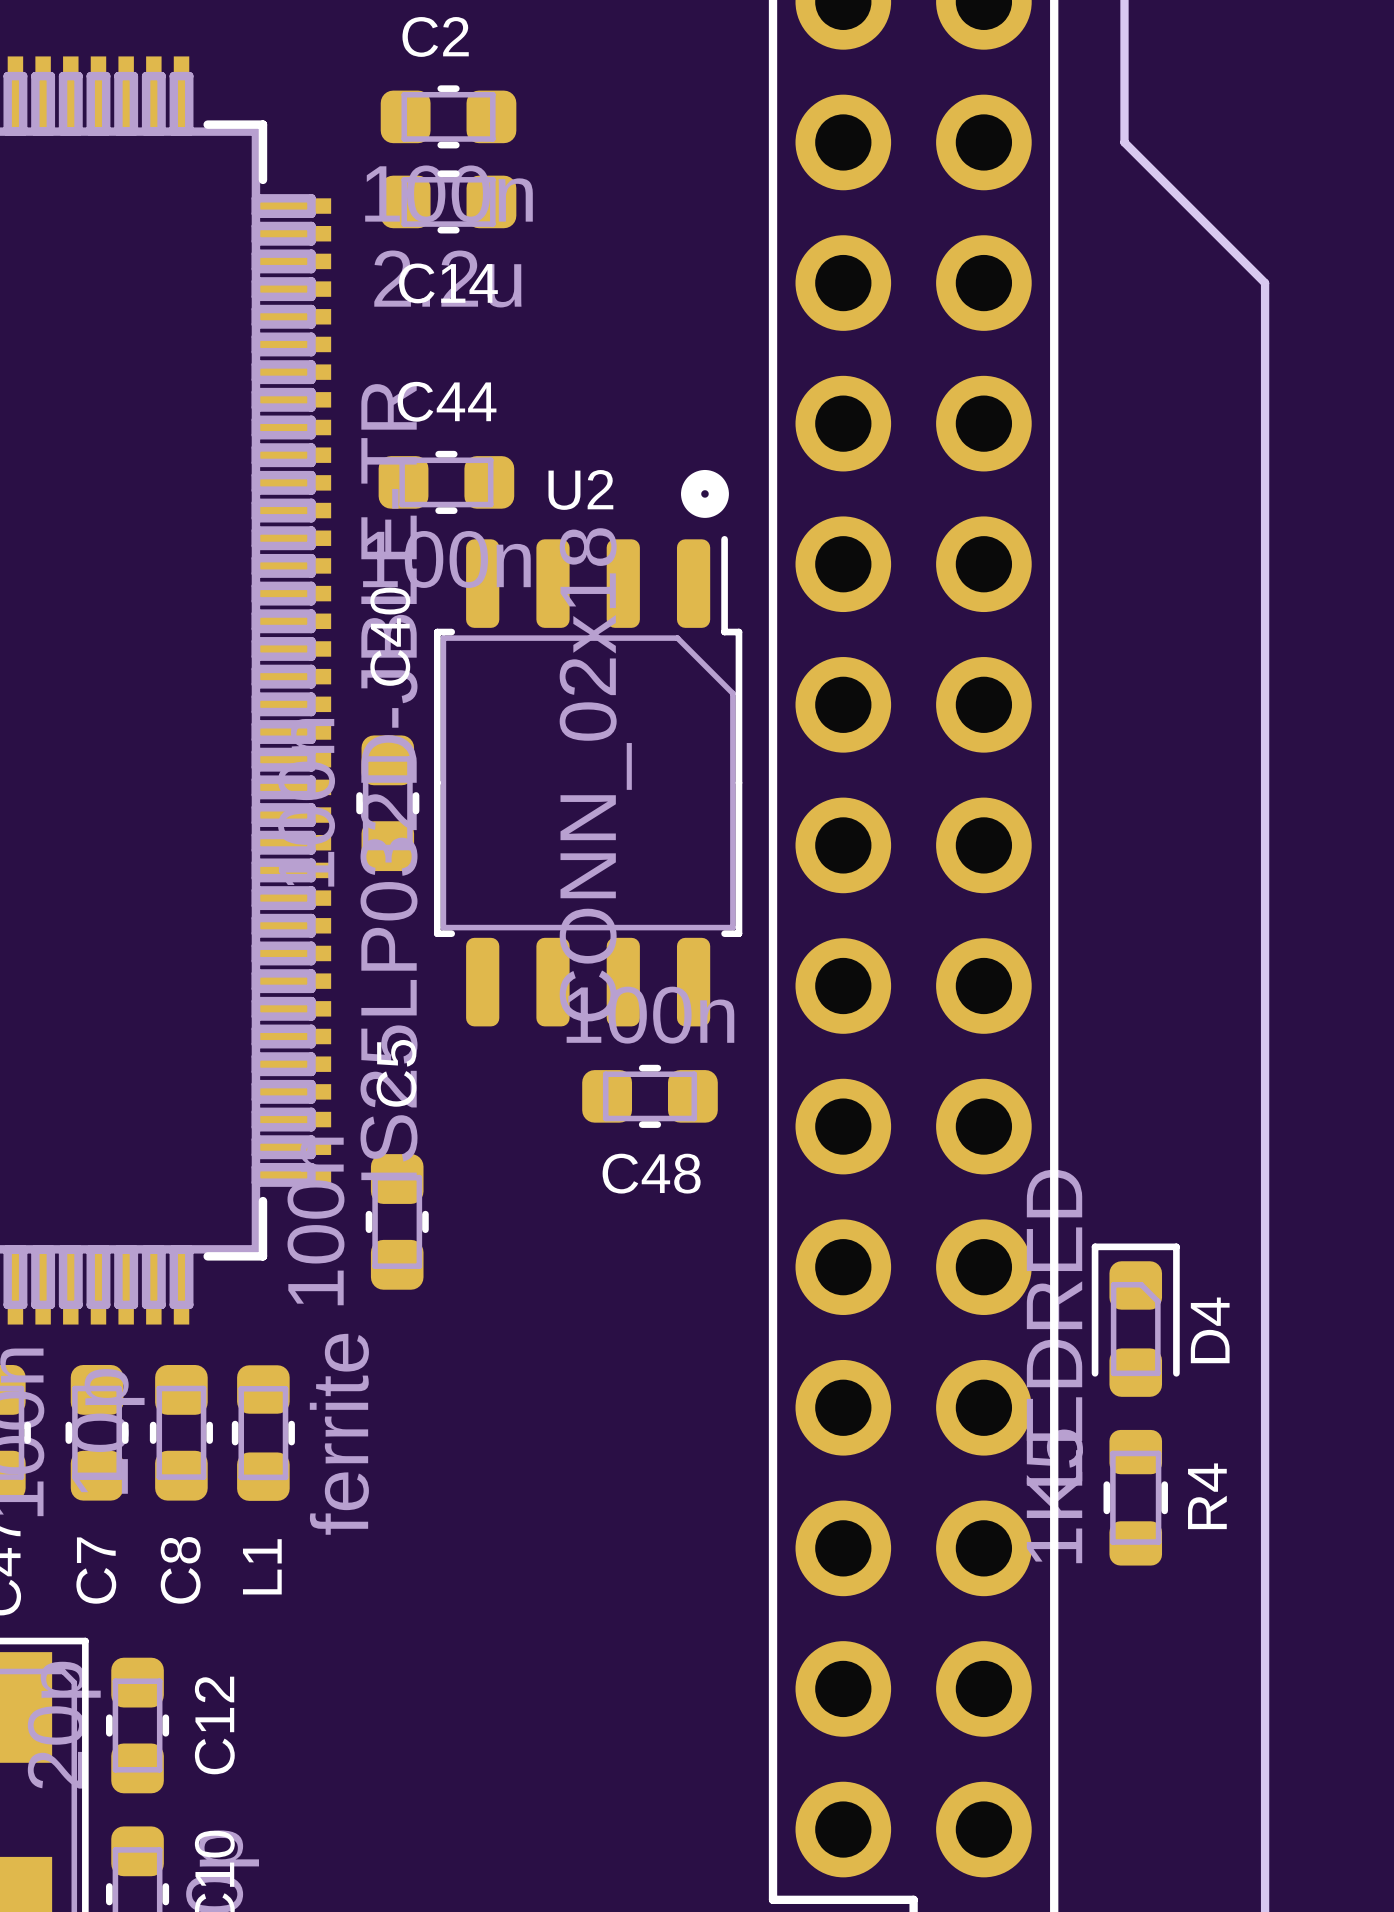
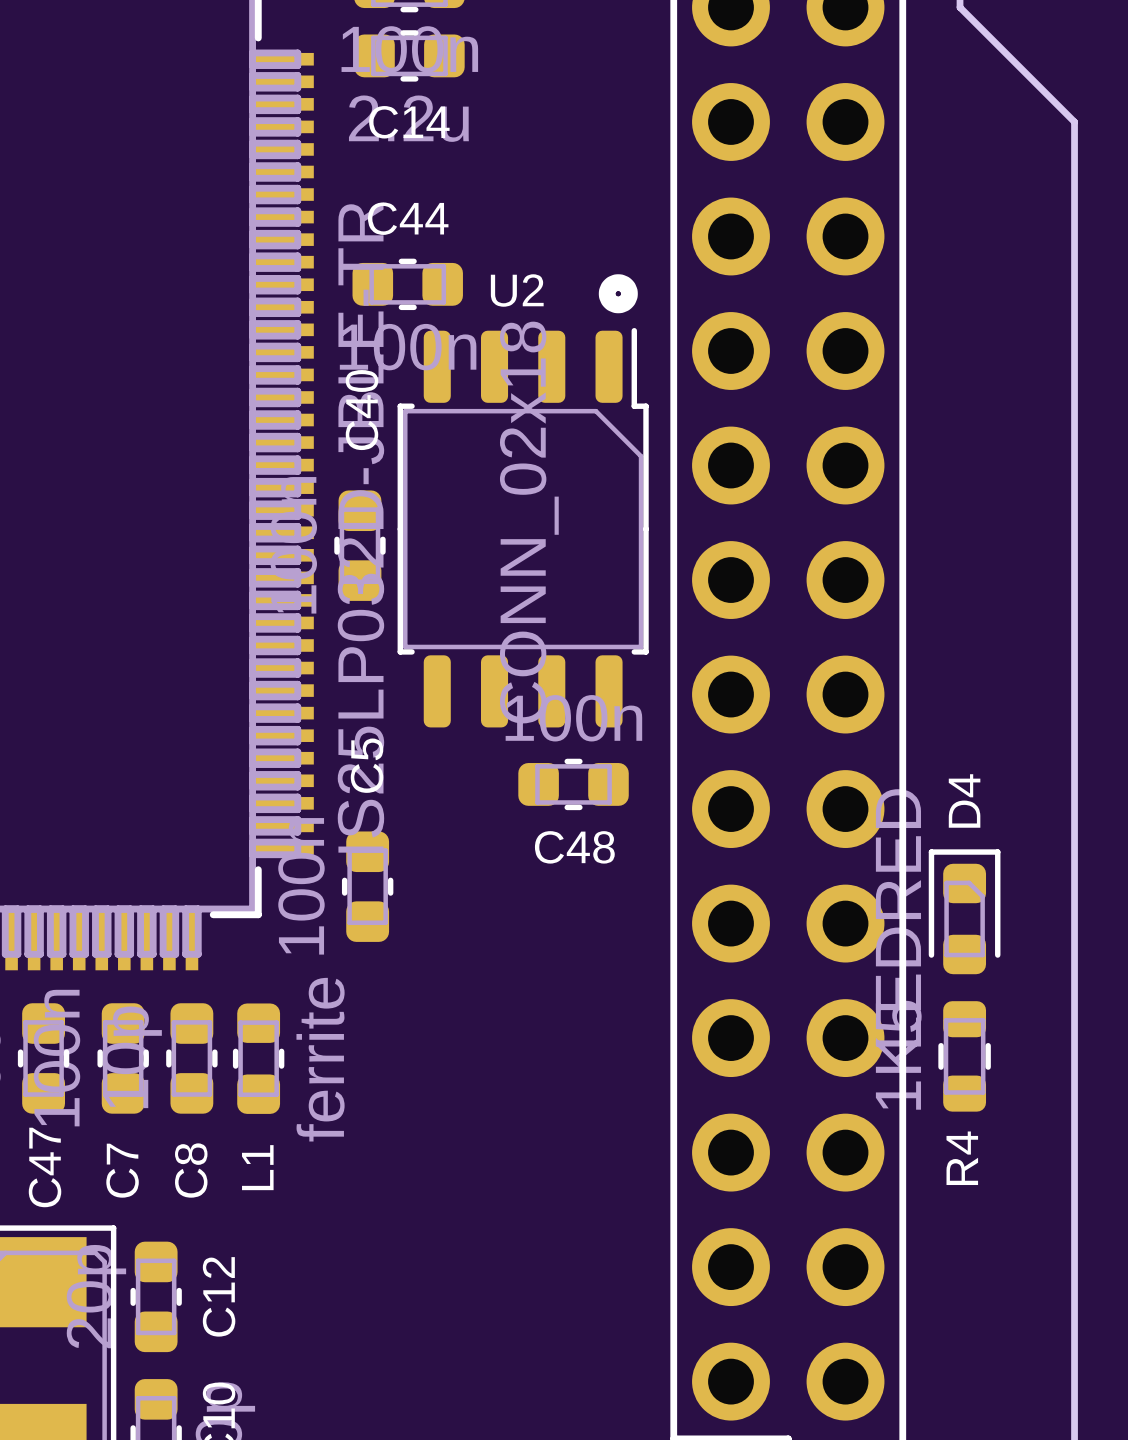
D4 position: (1135, 1320) -> (964, 911)
D4 name position: D4 (1210, 1330) -> D4 (964, 800)
R4 name position: R4 (1207, 1496) -> R4 (962, 1158)
R4 position: (1135, 1497) -> (964, 1056)

